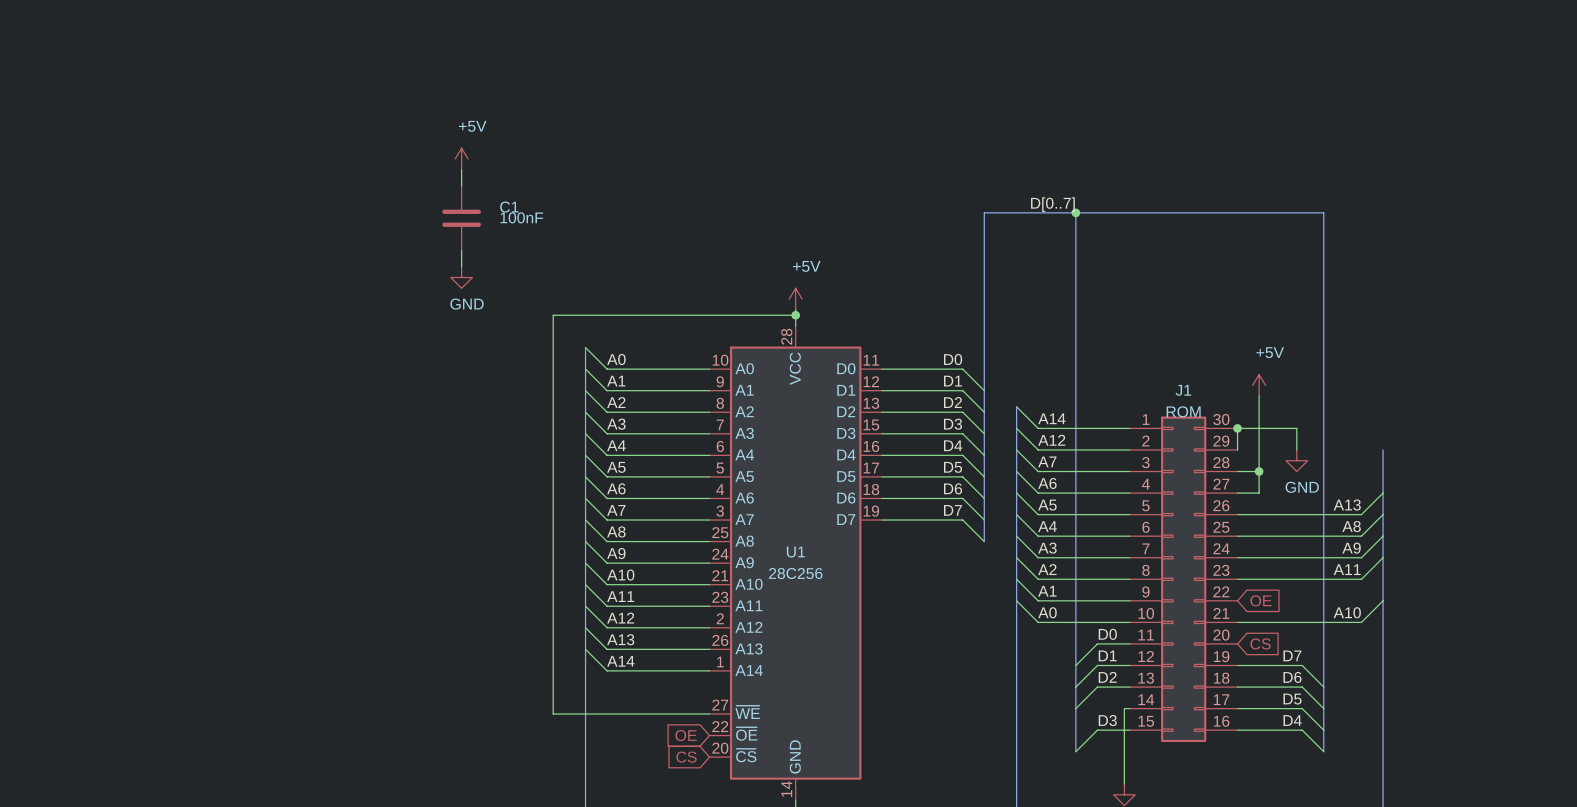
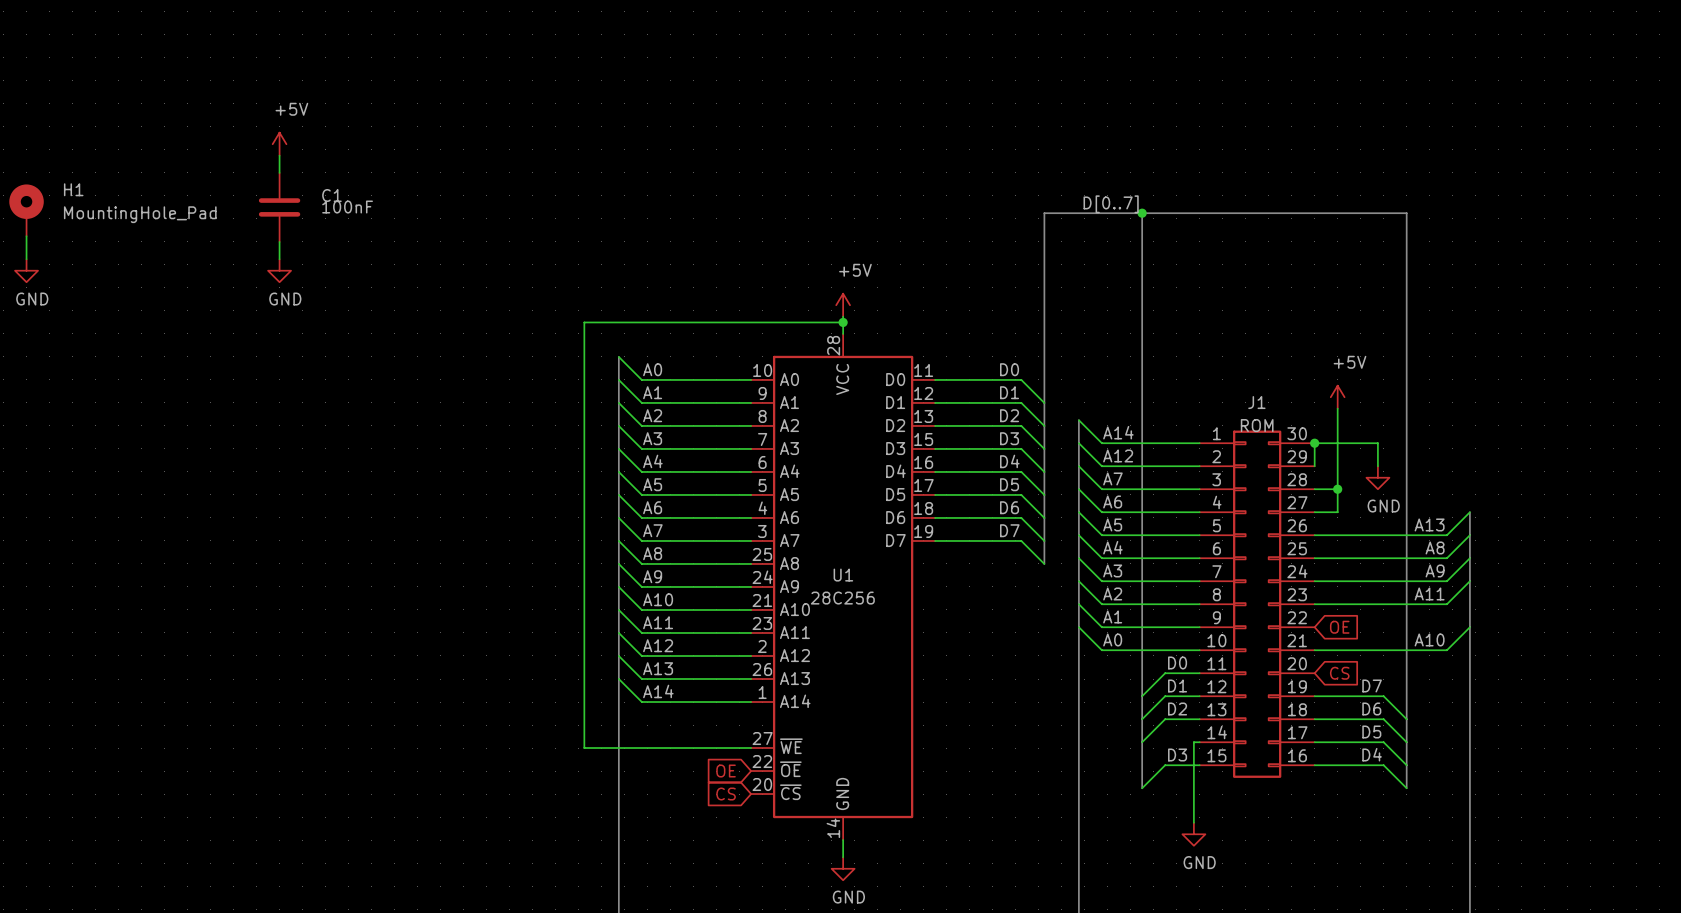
power symbol position: +5V (461, 158) -> +5V (279, 144)
wire: (461, 169) (461, 185) -> (279, 155) (279, 172)
H1: none -> MountingHole_Pad (26, 210)
C1 position: (461, 218) -> (279, 207)
wire: none -> (26, 236) (26, 259)
wire: (461, 250) (461, 266) -> (279, 241) (279, 259)
power symbol: none -> GND (26, 270)
power symbol position: GND (461, 277) -> GND (279, 270)
bus: (1383, 449) (1383, 493) -> none

